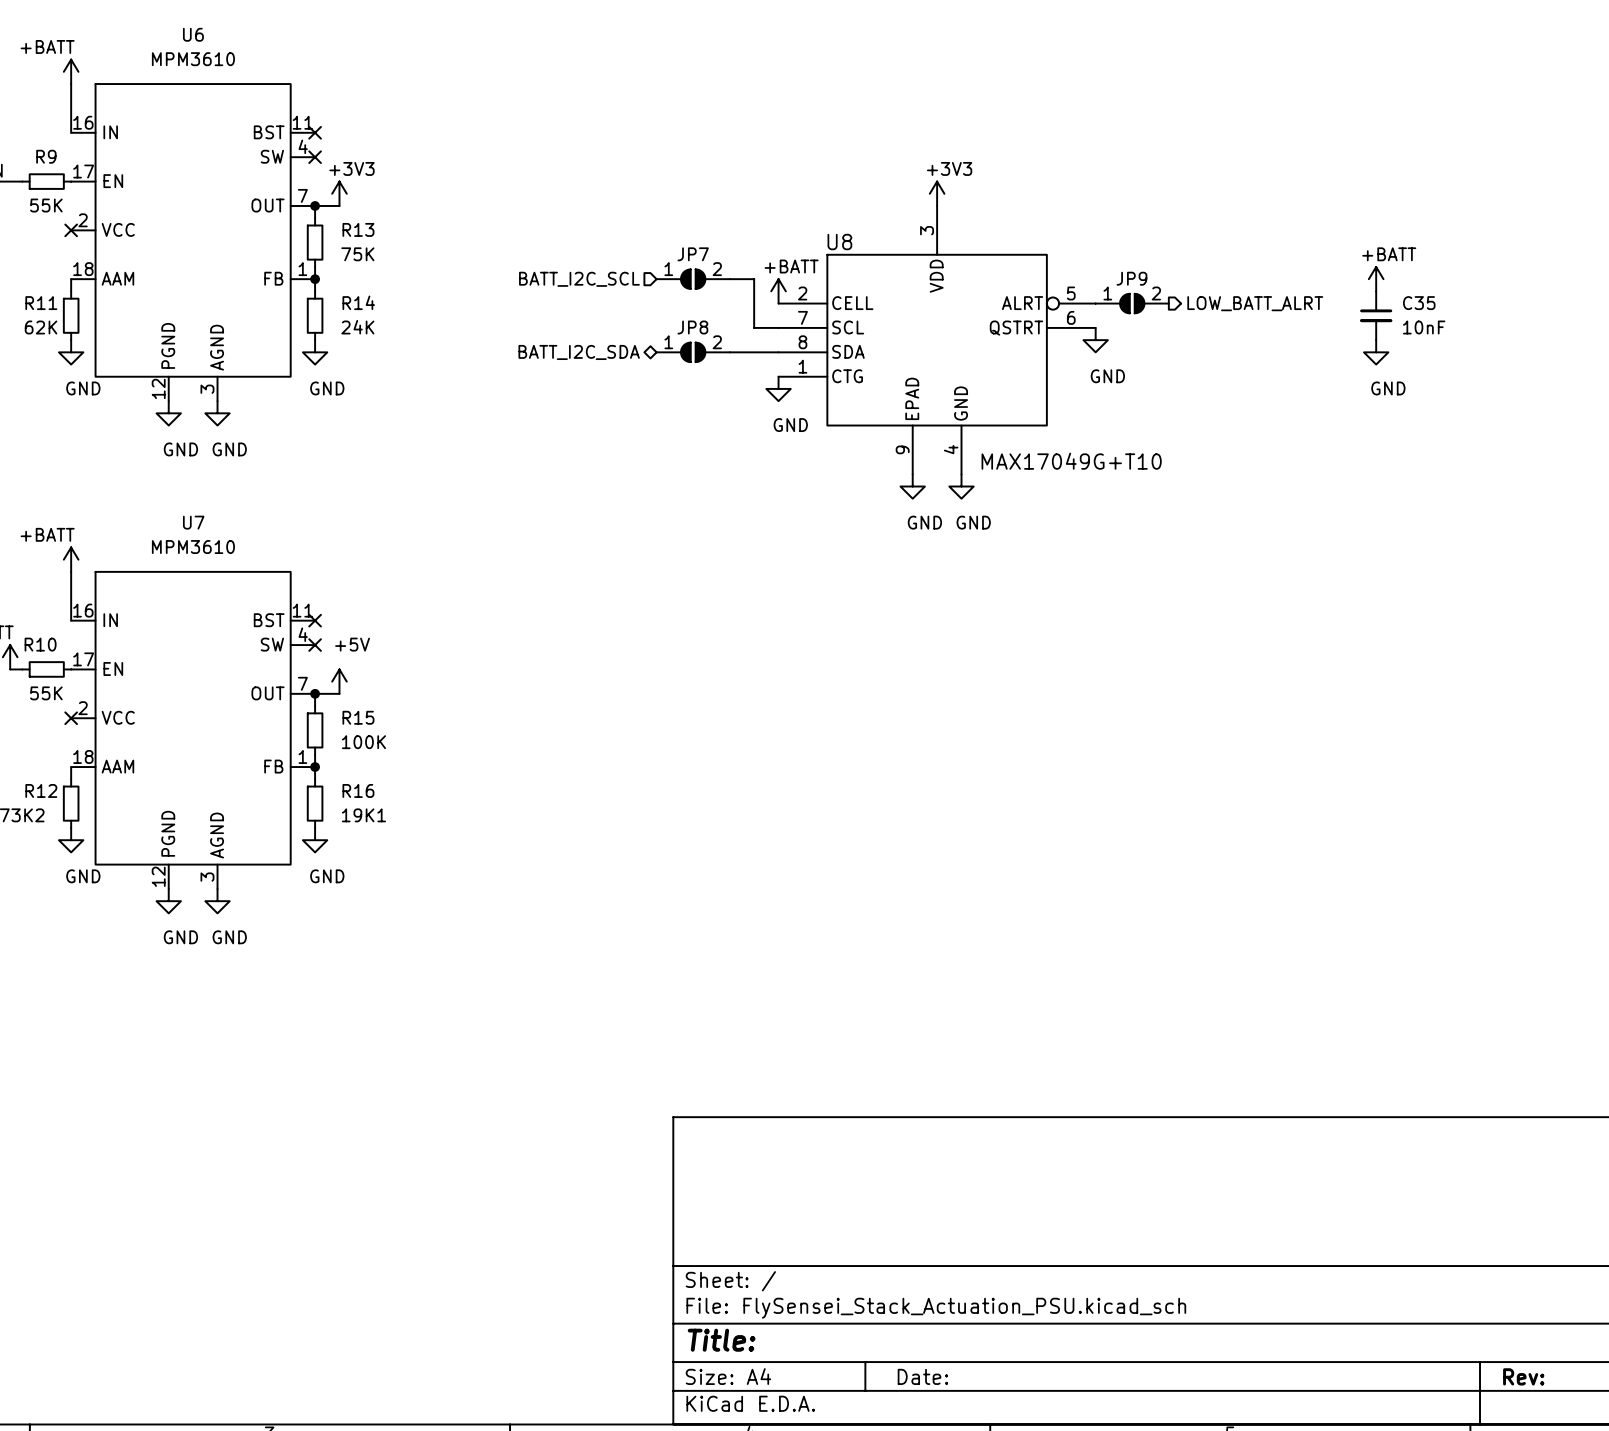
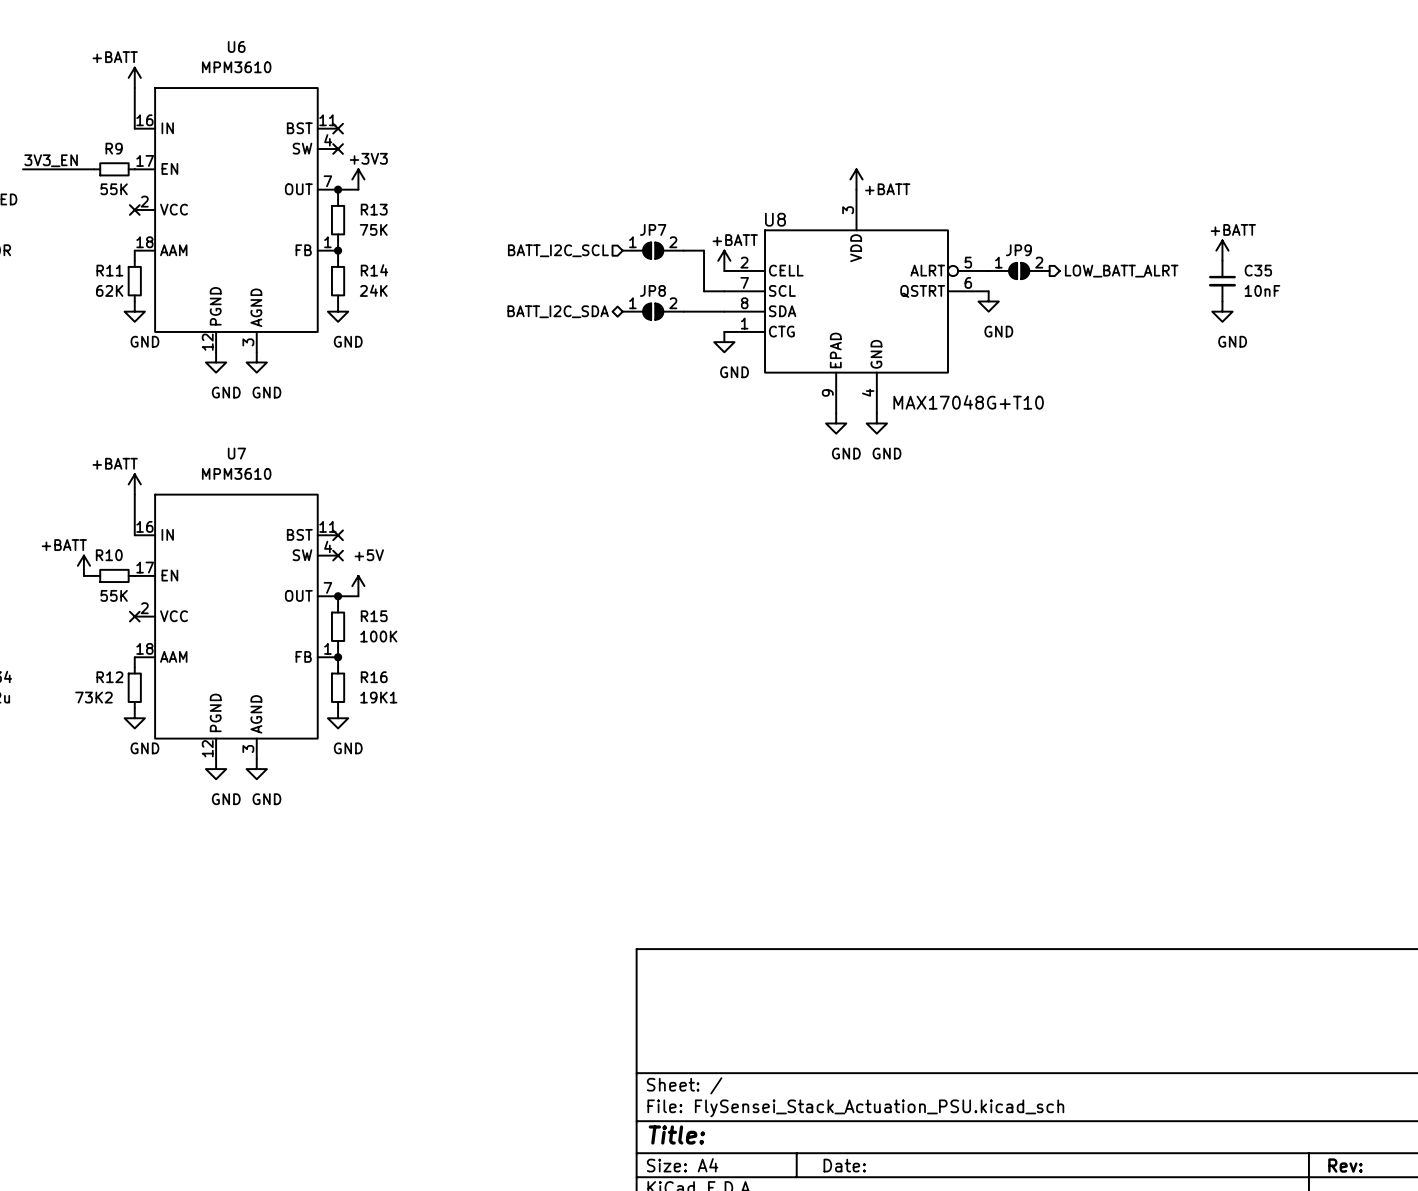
power symbol: +3V3 (937, 193) -> +BATT (856, 179)
U8 value: MAX17049G+T10 (1071, 461) -> MAX17048G+T10 (968, 402)

